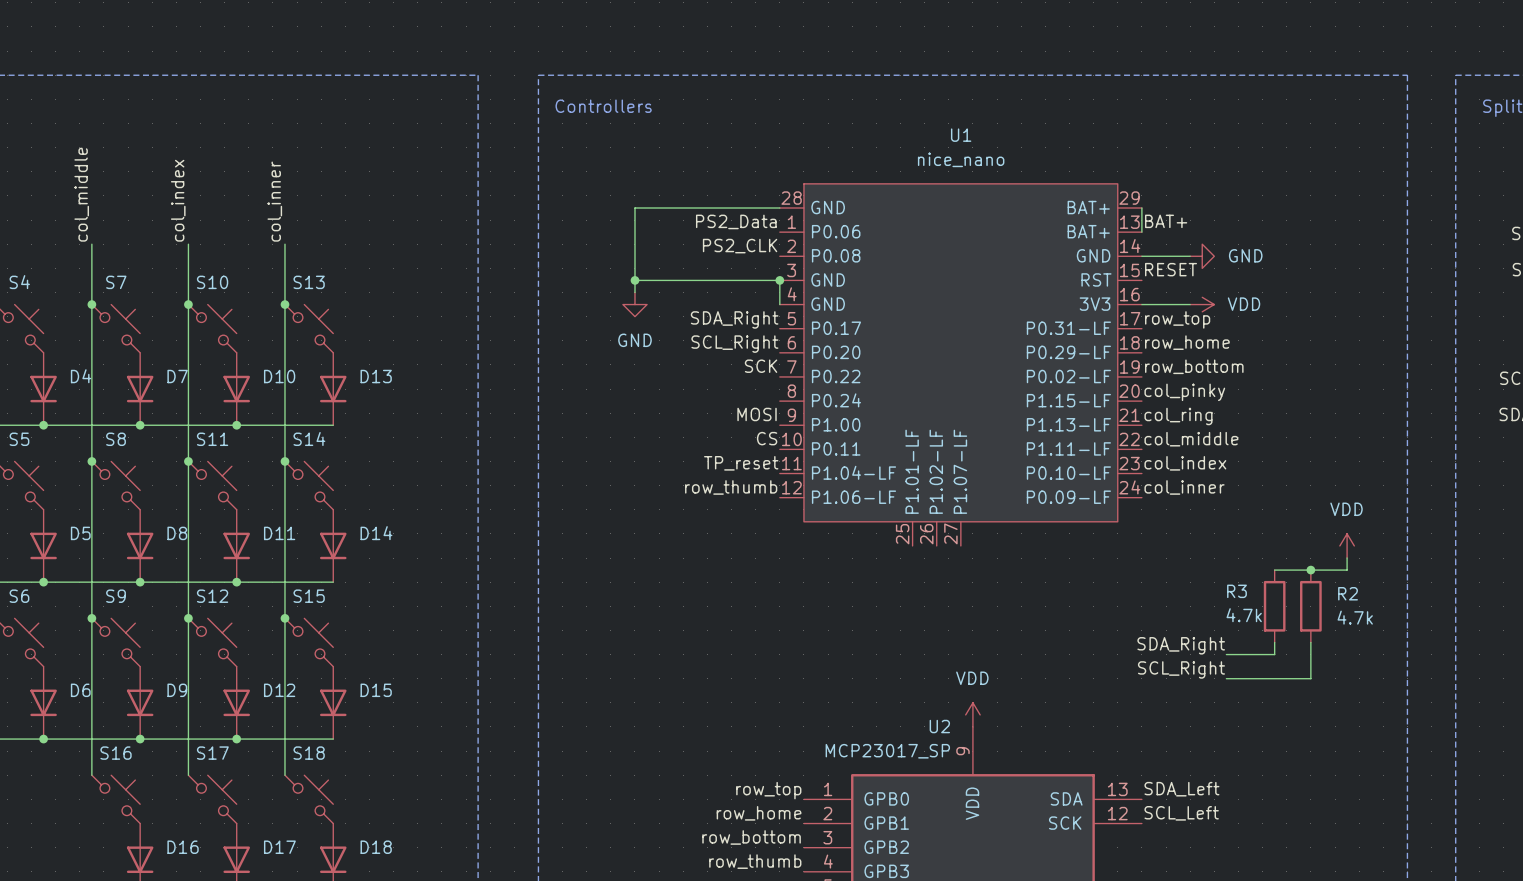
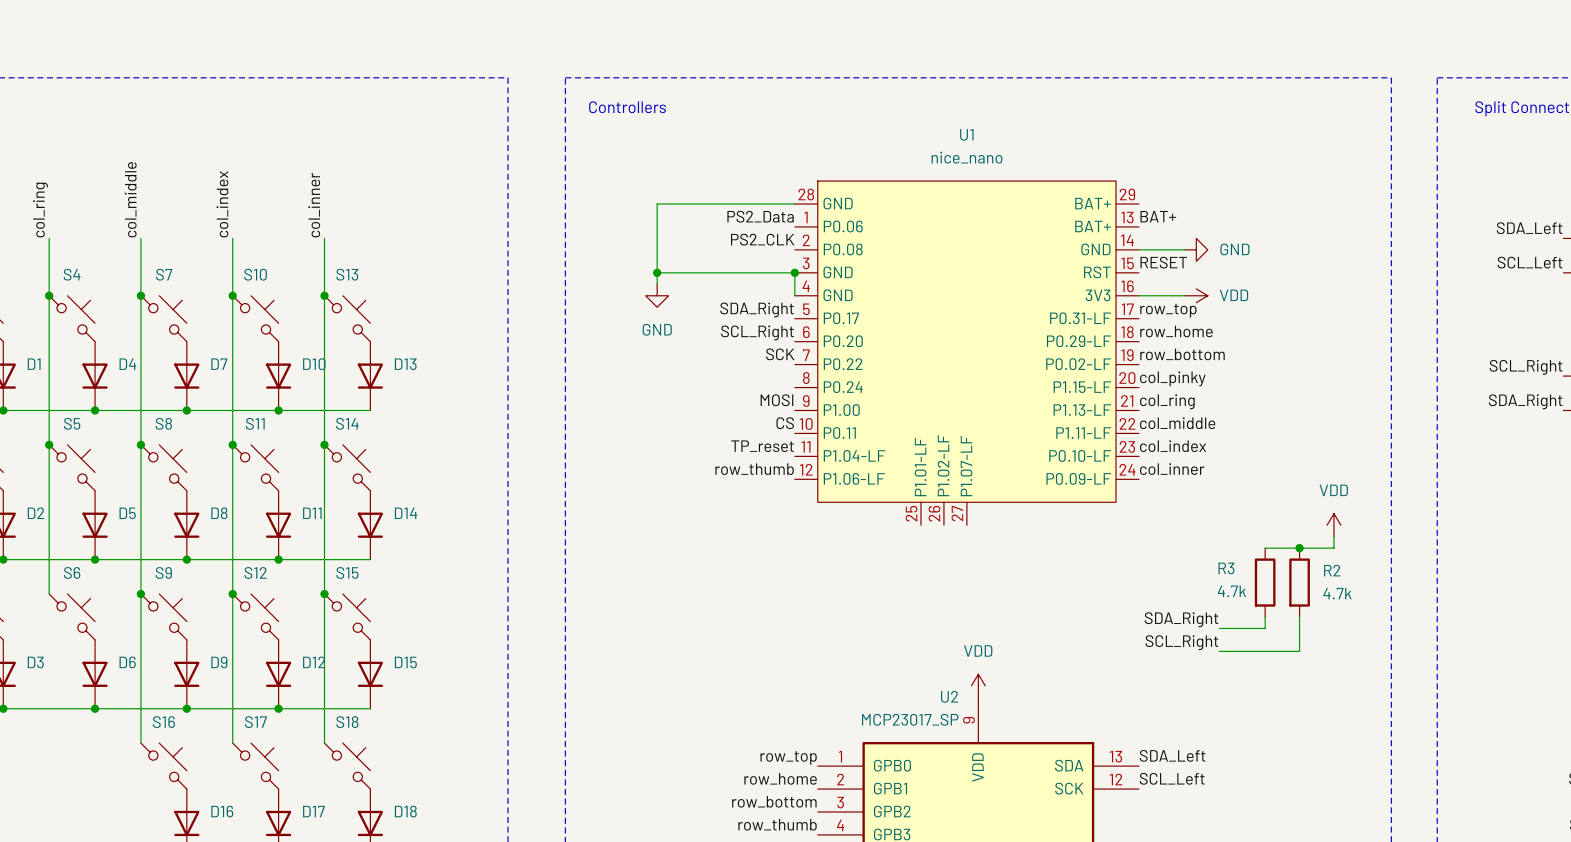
wire: (1141, 208) (1141, 232) -> none

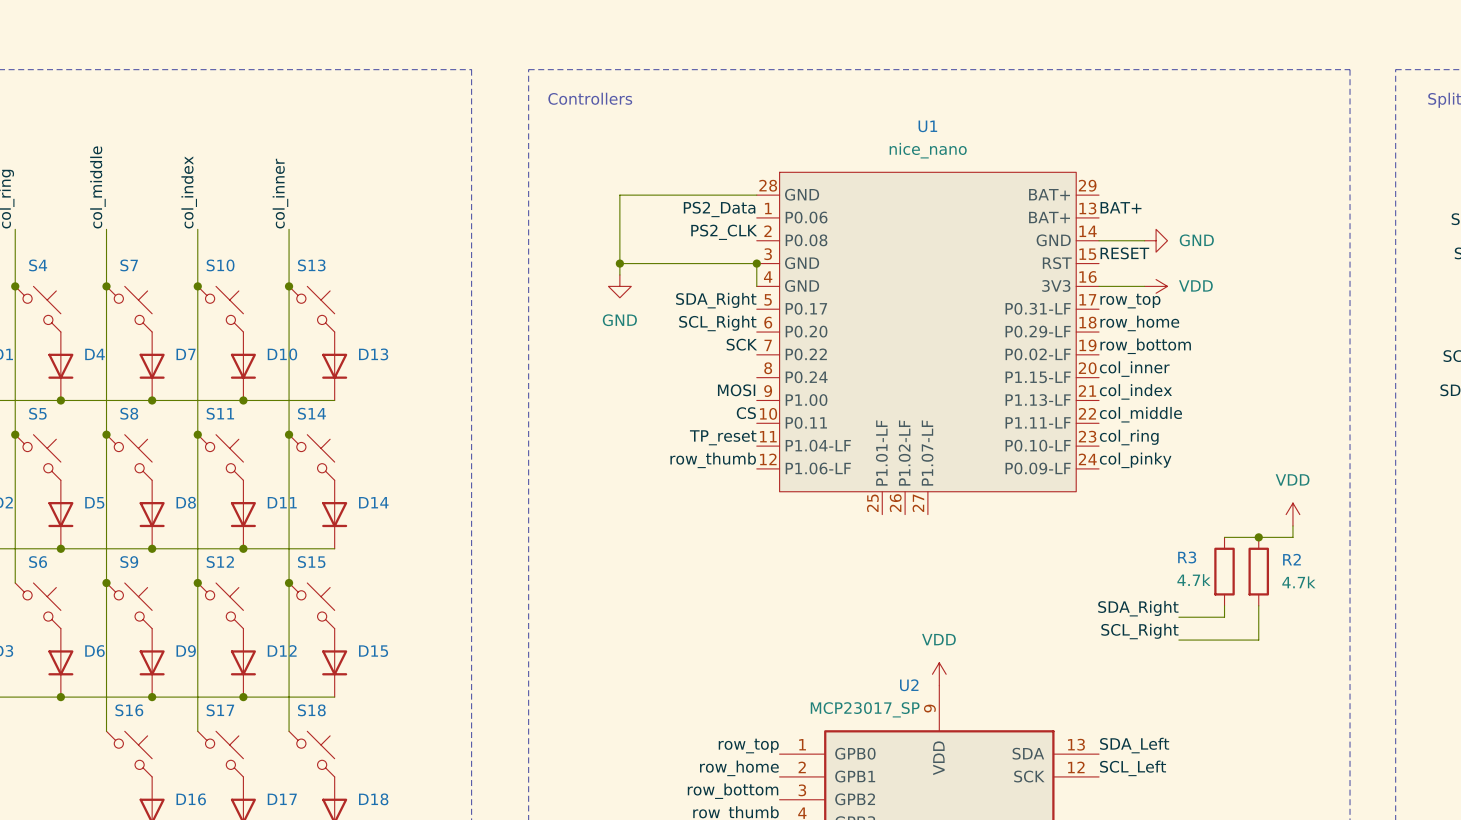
label: col_pinky (1172, 378) -> col_inner (1134, 369)
label: col_ring (1167, 401) -> col_index (1135, 391)
label: col_index (1173, 446) -> col_ring (1129, 437)
label: col_inner (1172, 469) -> col_pinky (1135, 460)

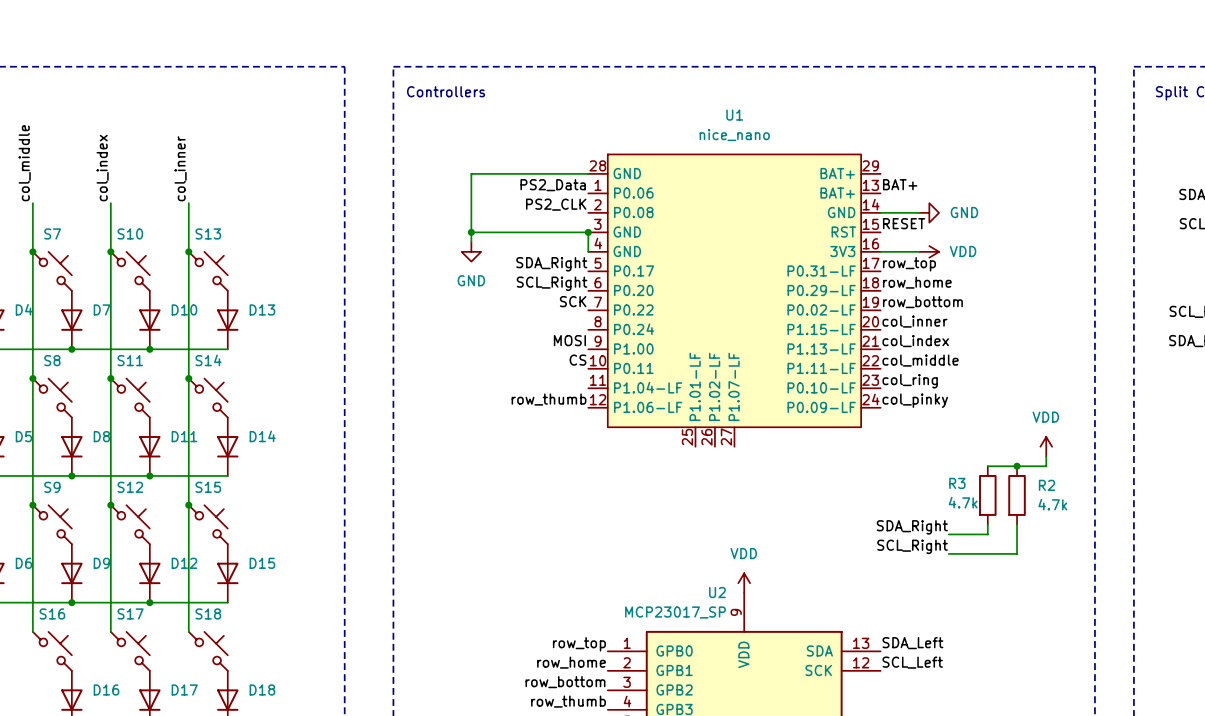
label: TP_reset (723, 437) -> none

